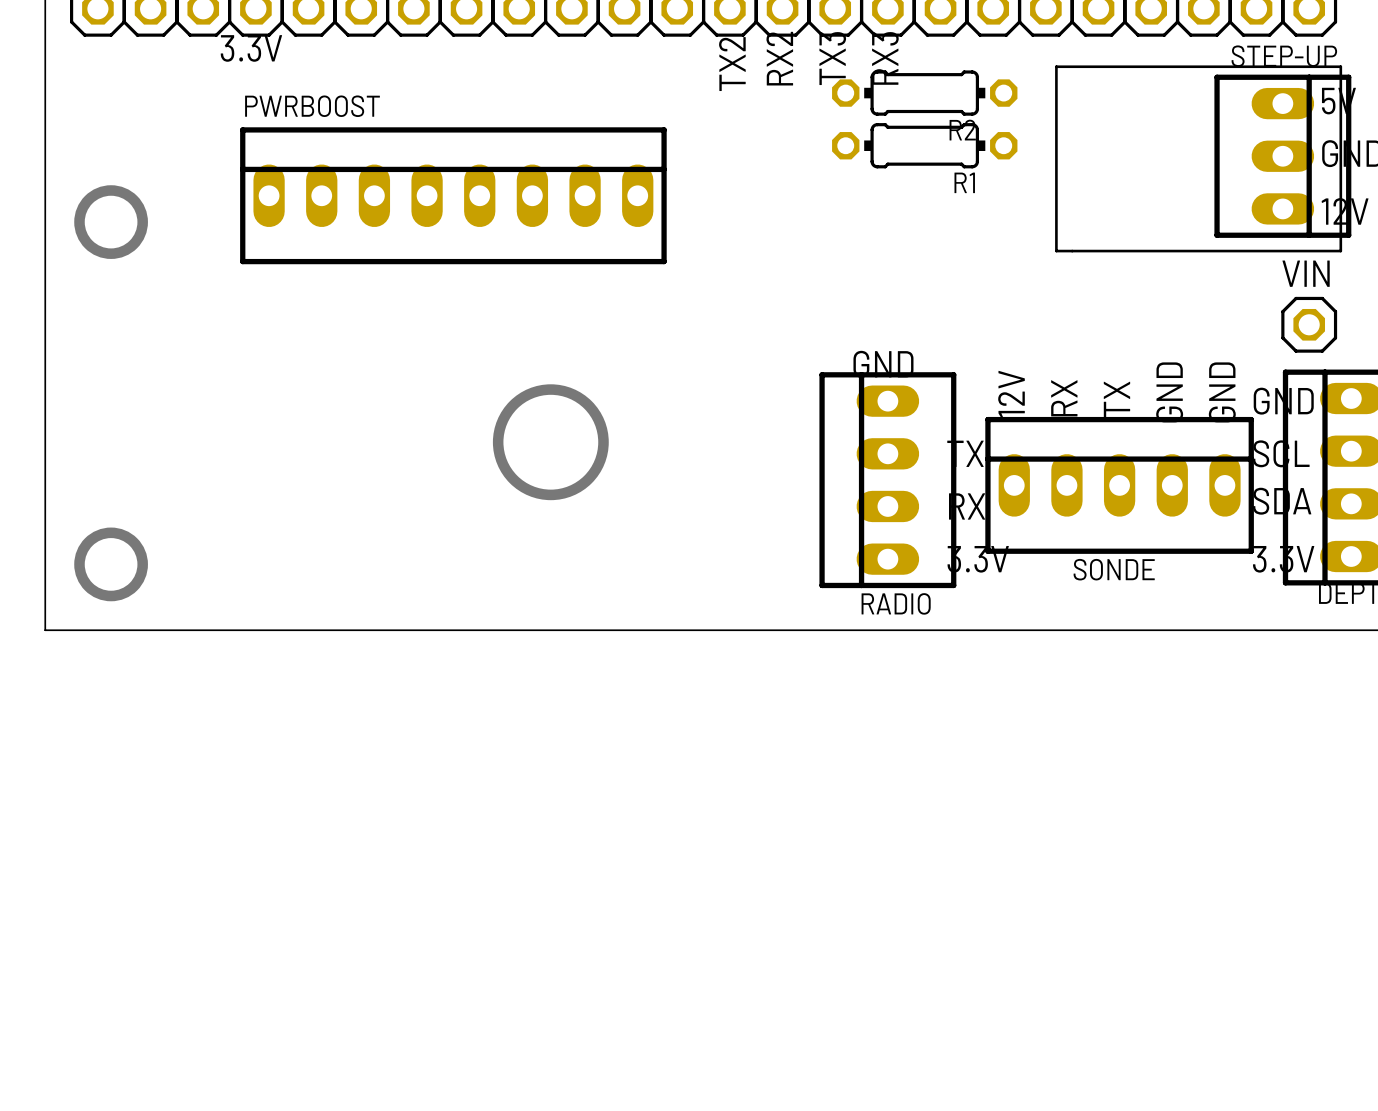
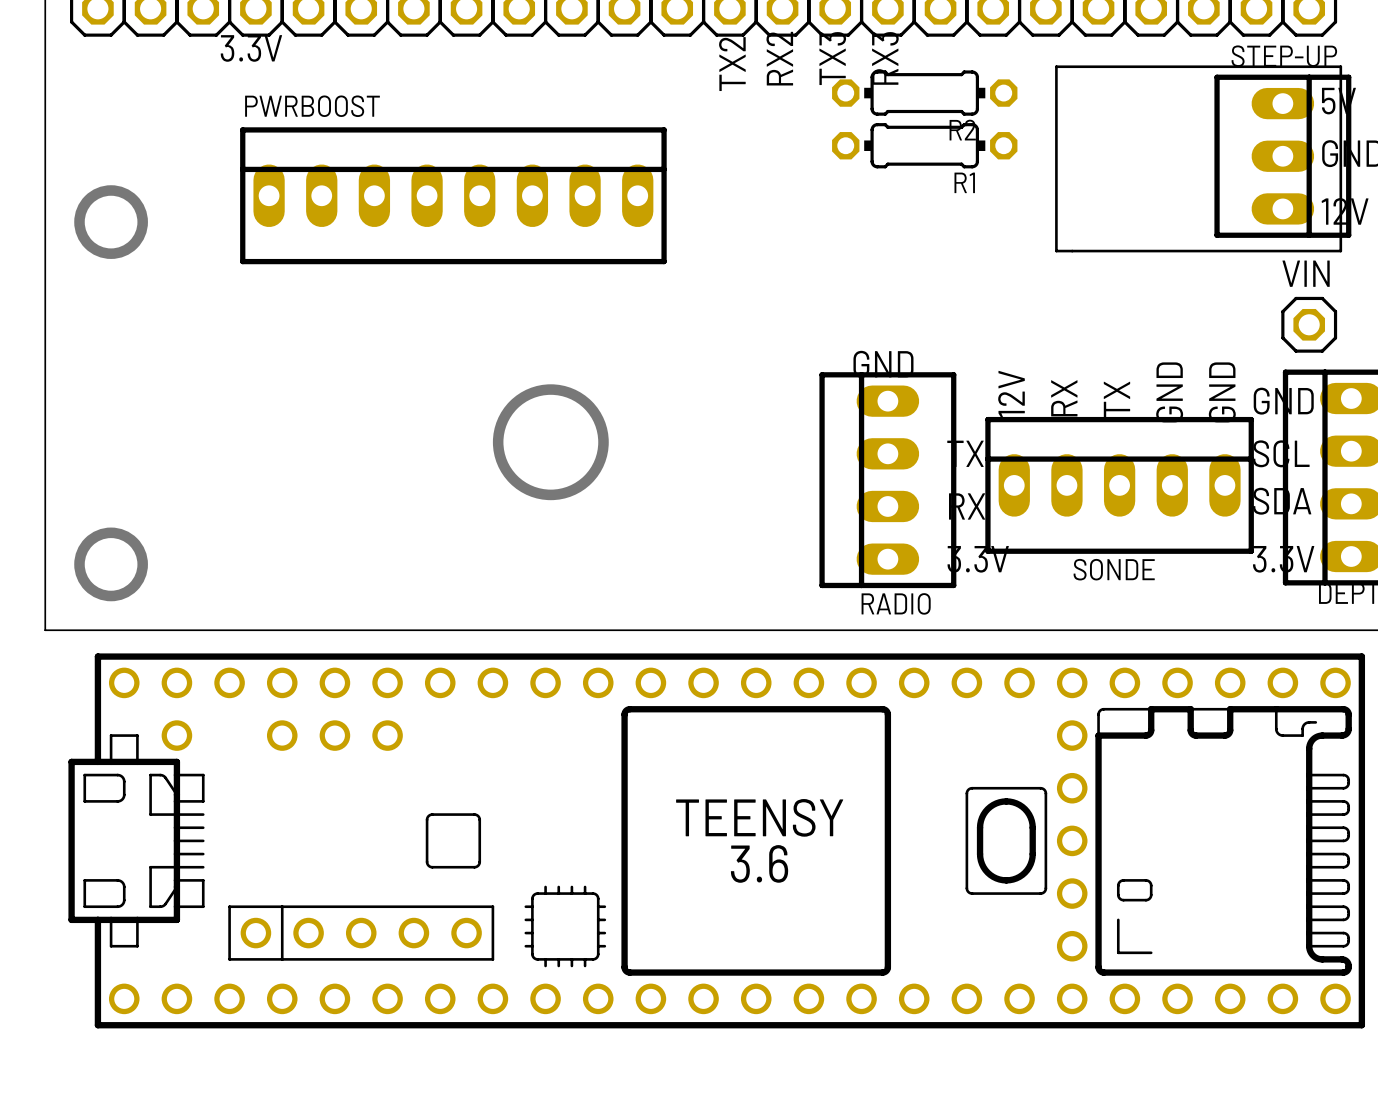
part: none -> (716, 840)

